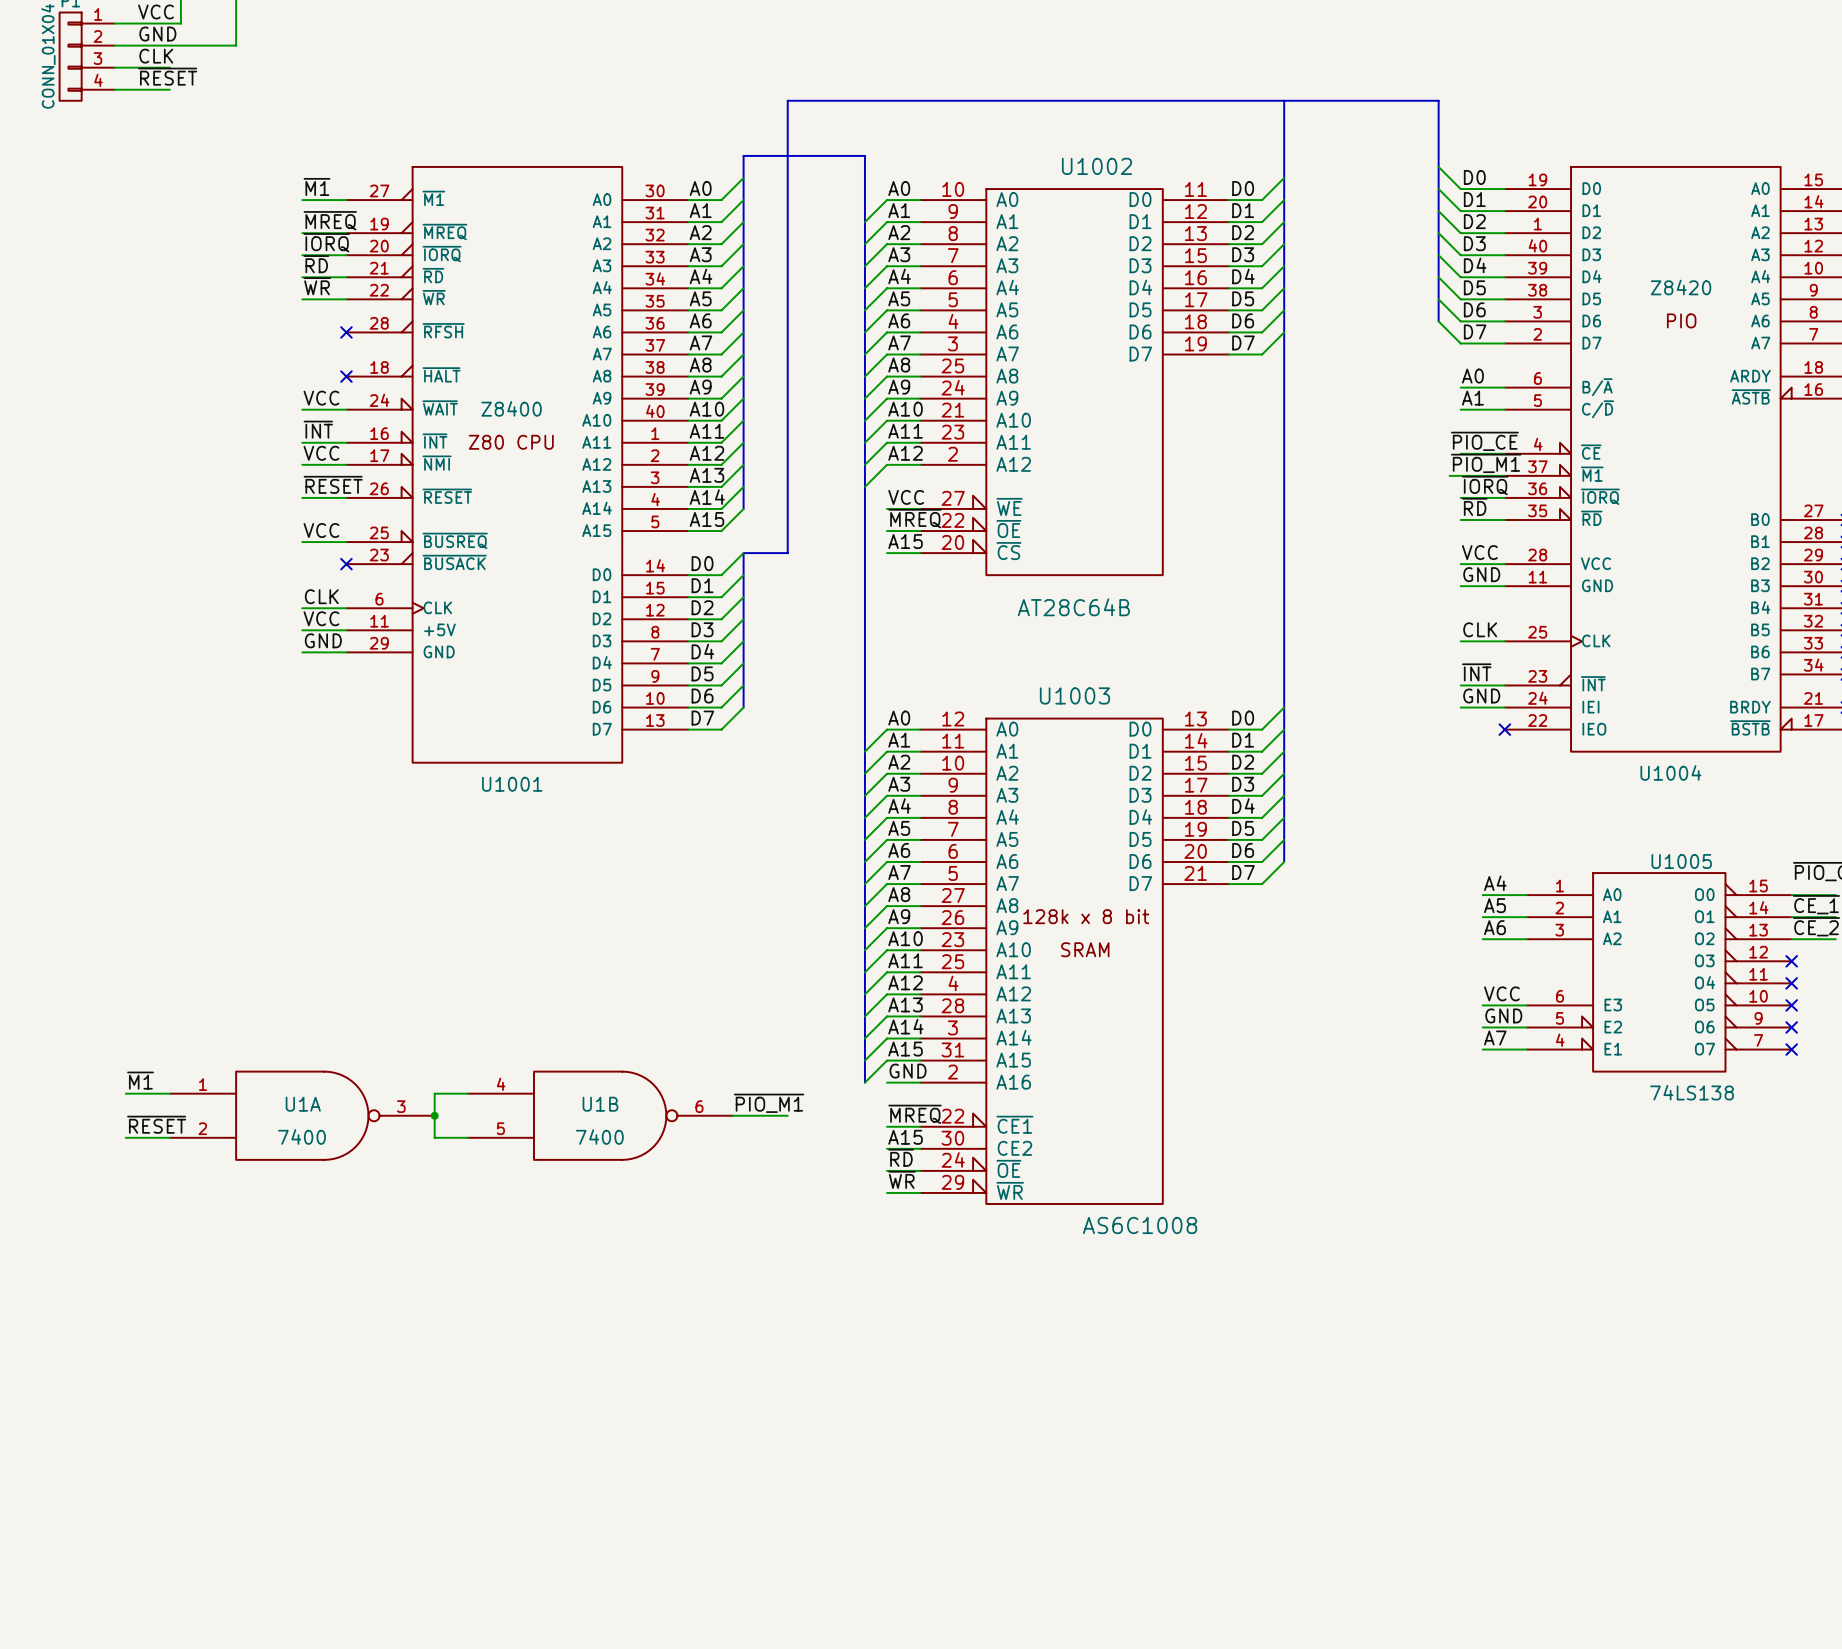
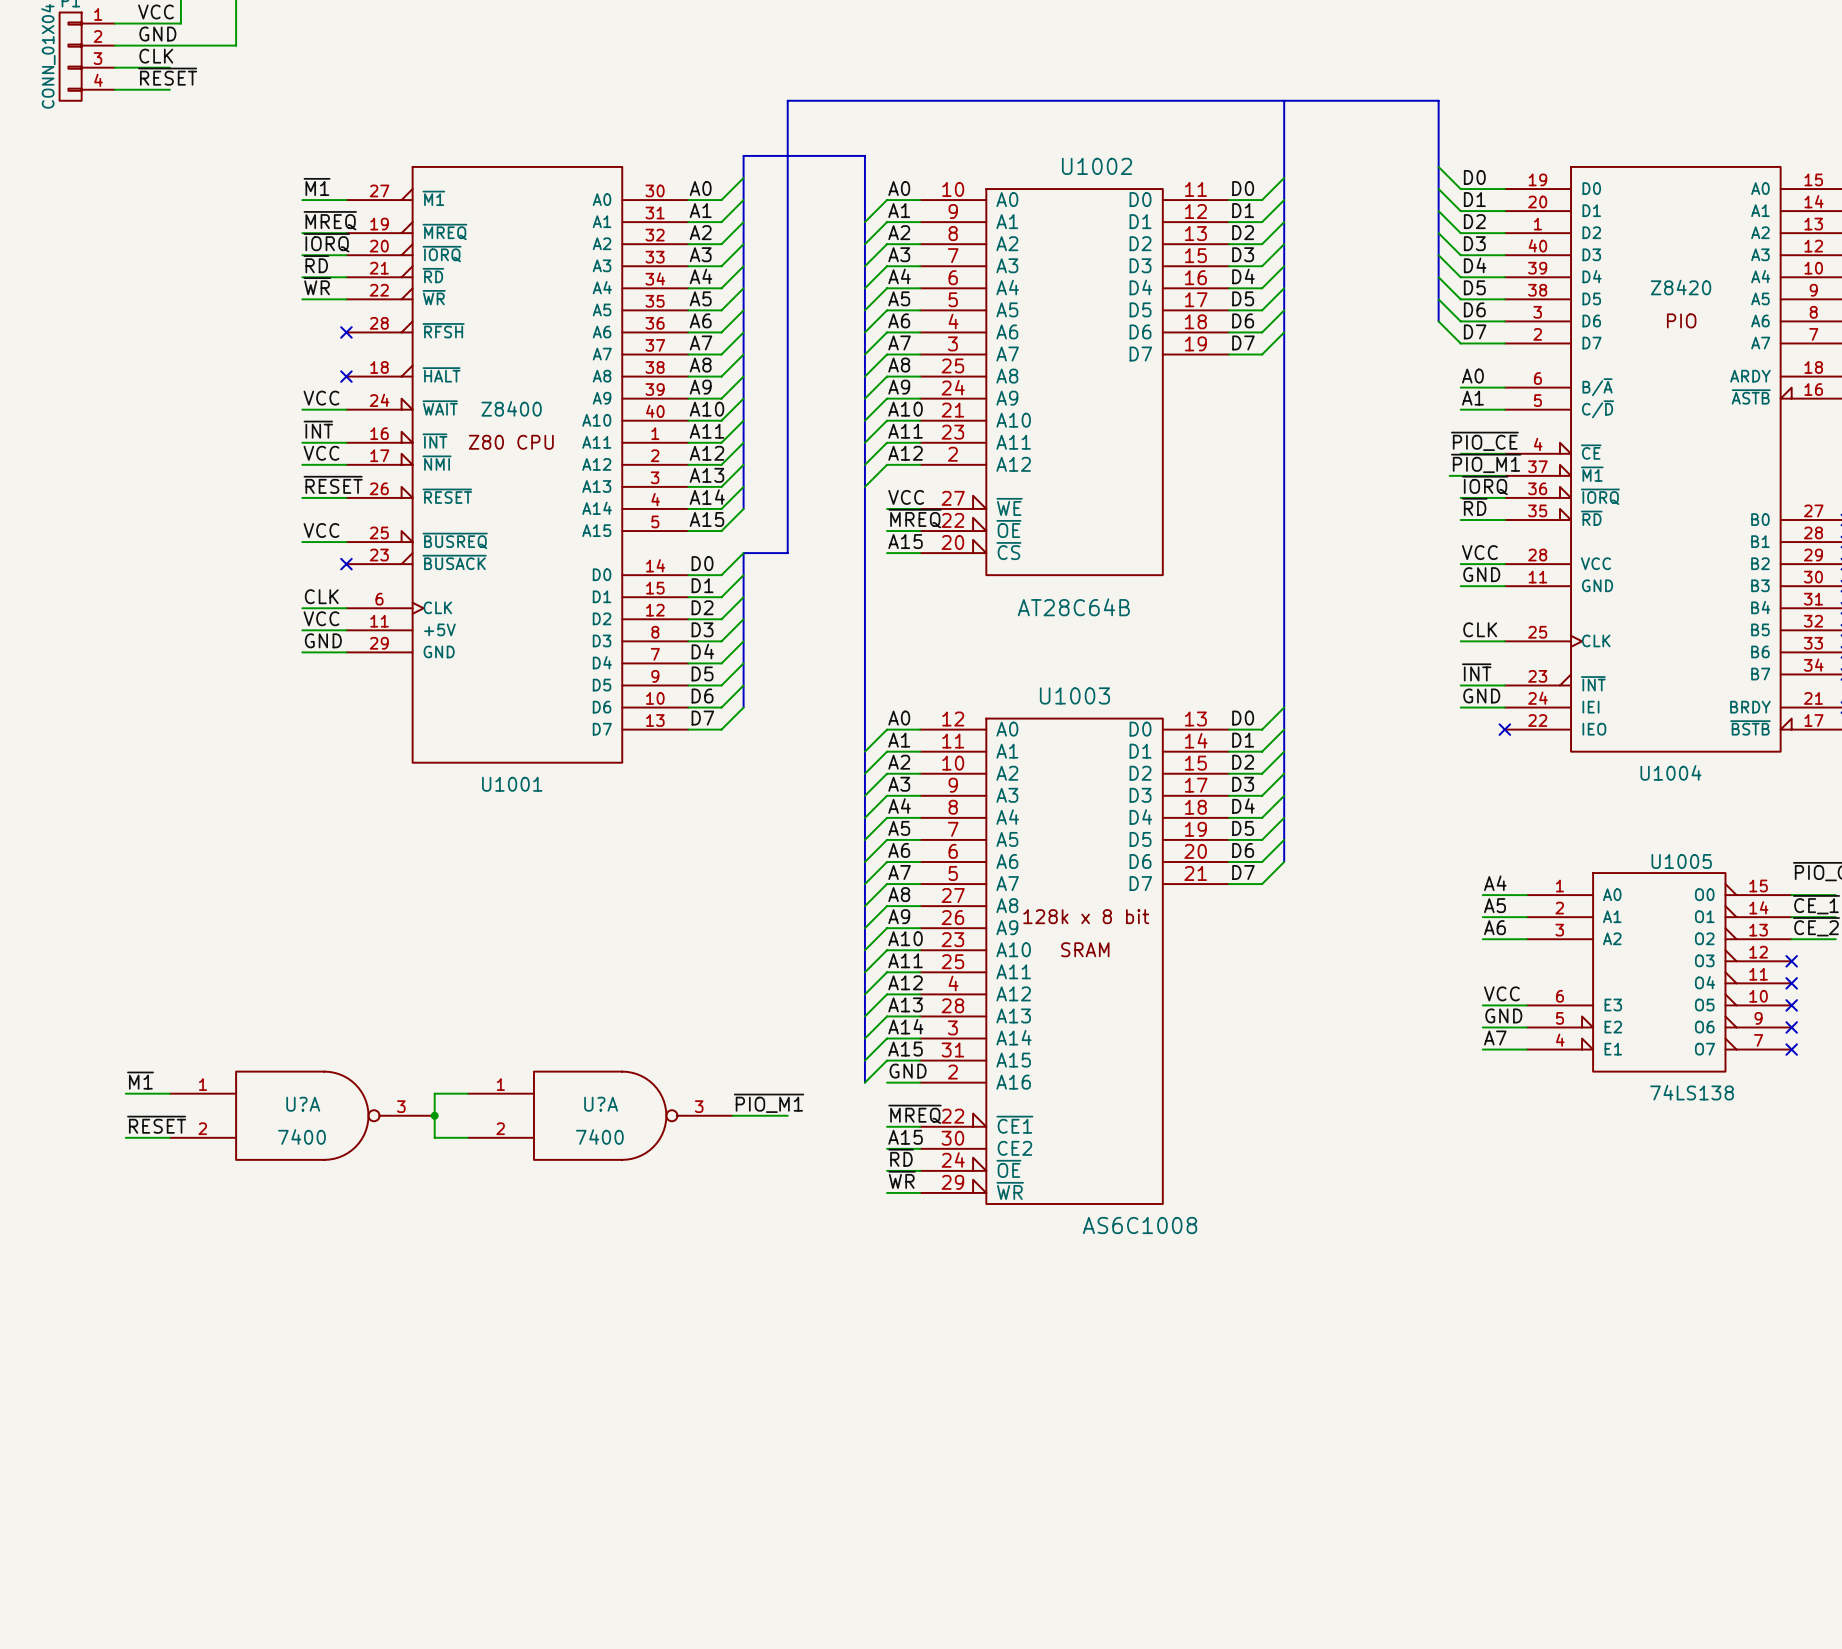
U1B pin number: 4 (501, 1084) -> 1 (500, 1084)
U1A name: U1A (303, 1104) -> U?A (303, 1104)
U1B name: U1B (600, 1104) -> U?A (601, 1104)
U1B pin number: 6 (699, 1106) -> 3 (699, 1106)
U1B pin number: 5 (500, 1128) -> 2 (500, 1128)

